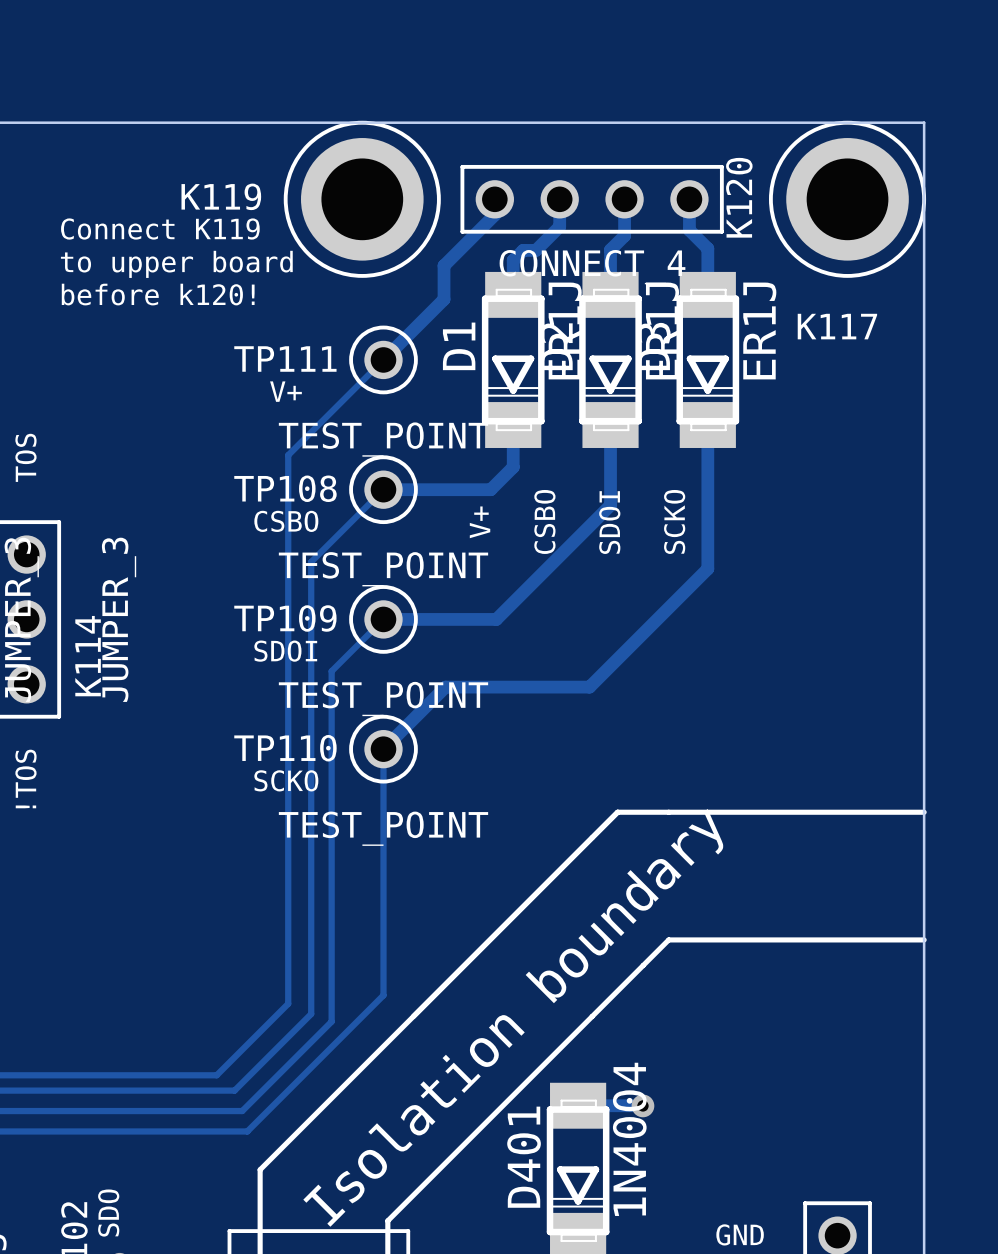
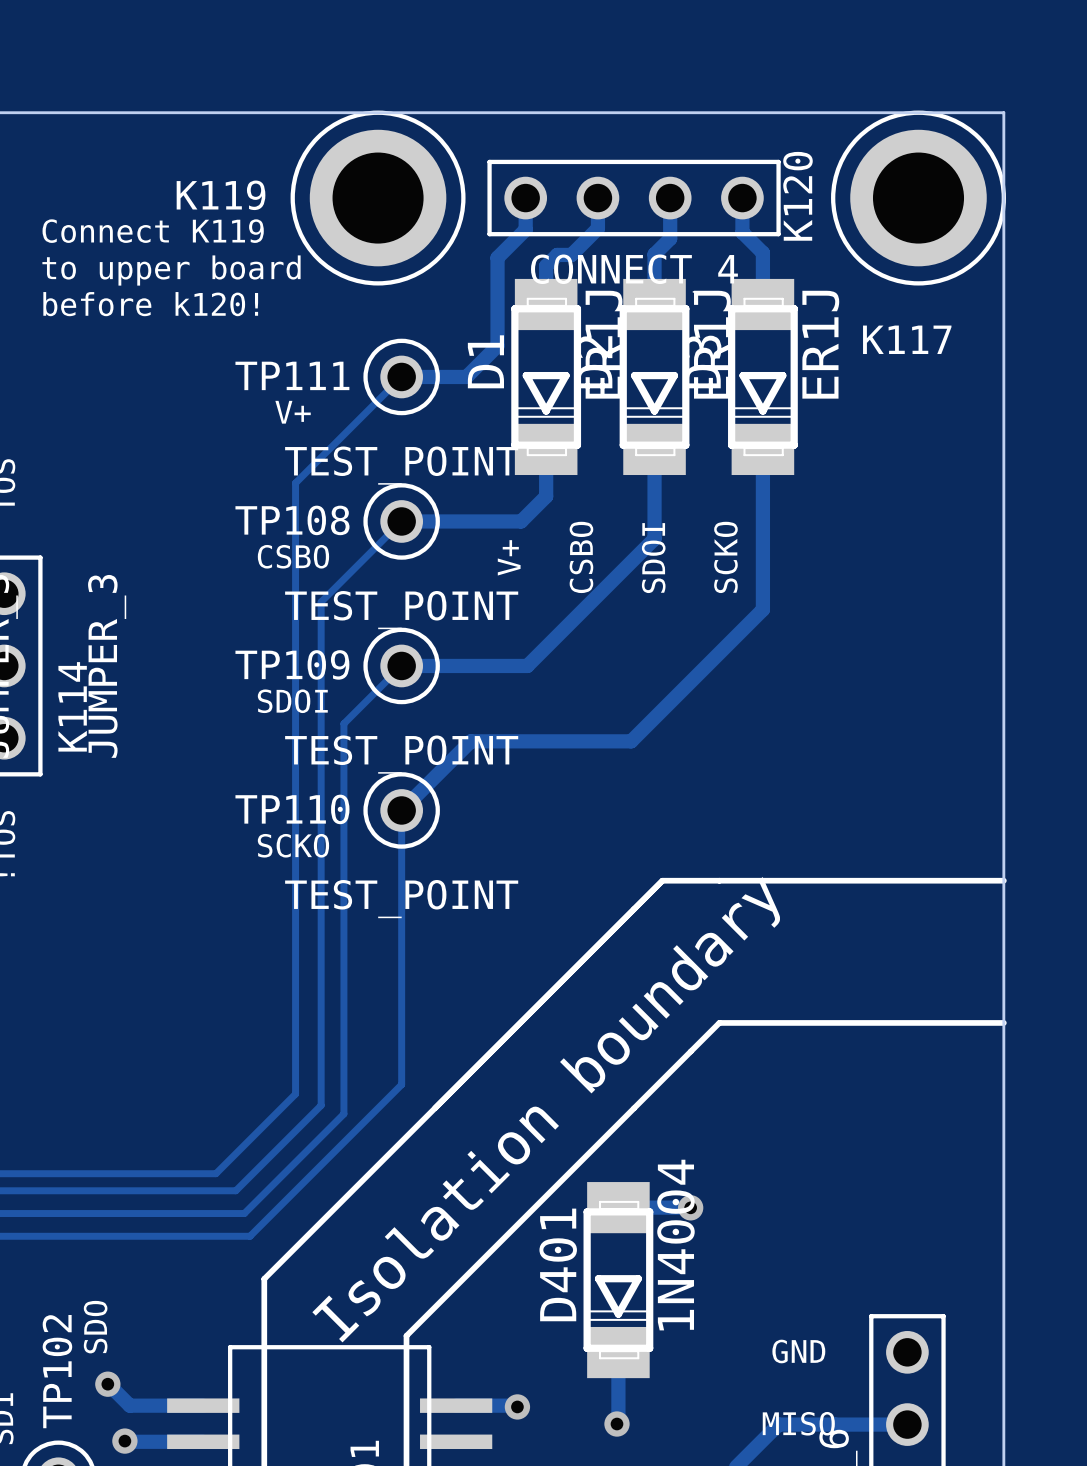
track: (494, 214) (444, 265) (444, 299) (383, 359) -> (525, 215) (525, 229) (497, 257) (497, 345) (466, 376) (401, 376)

